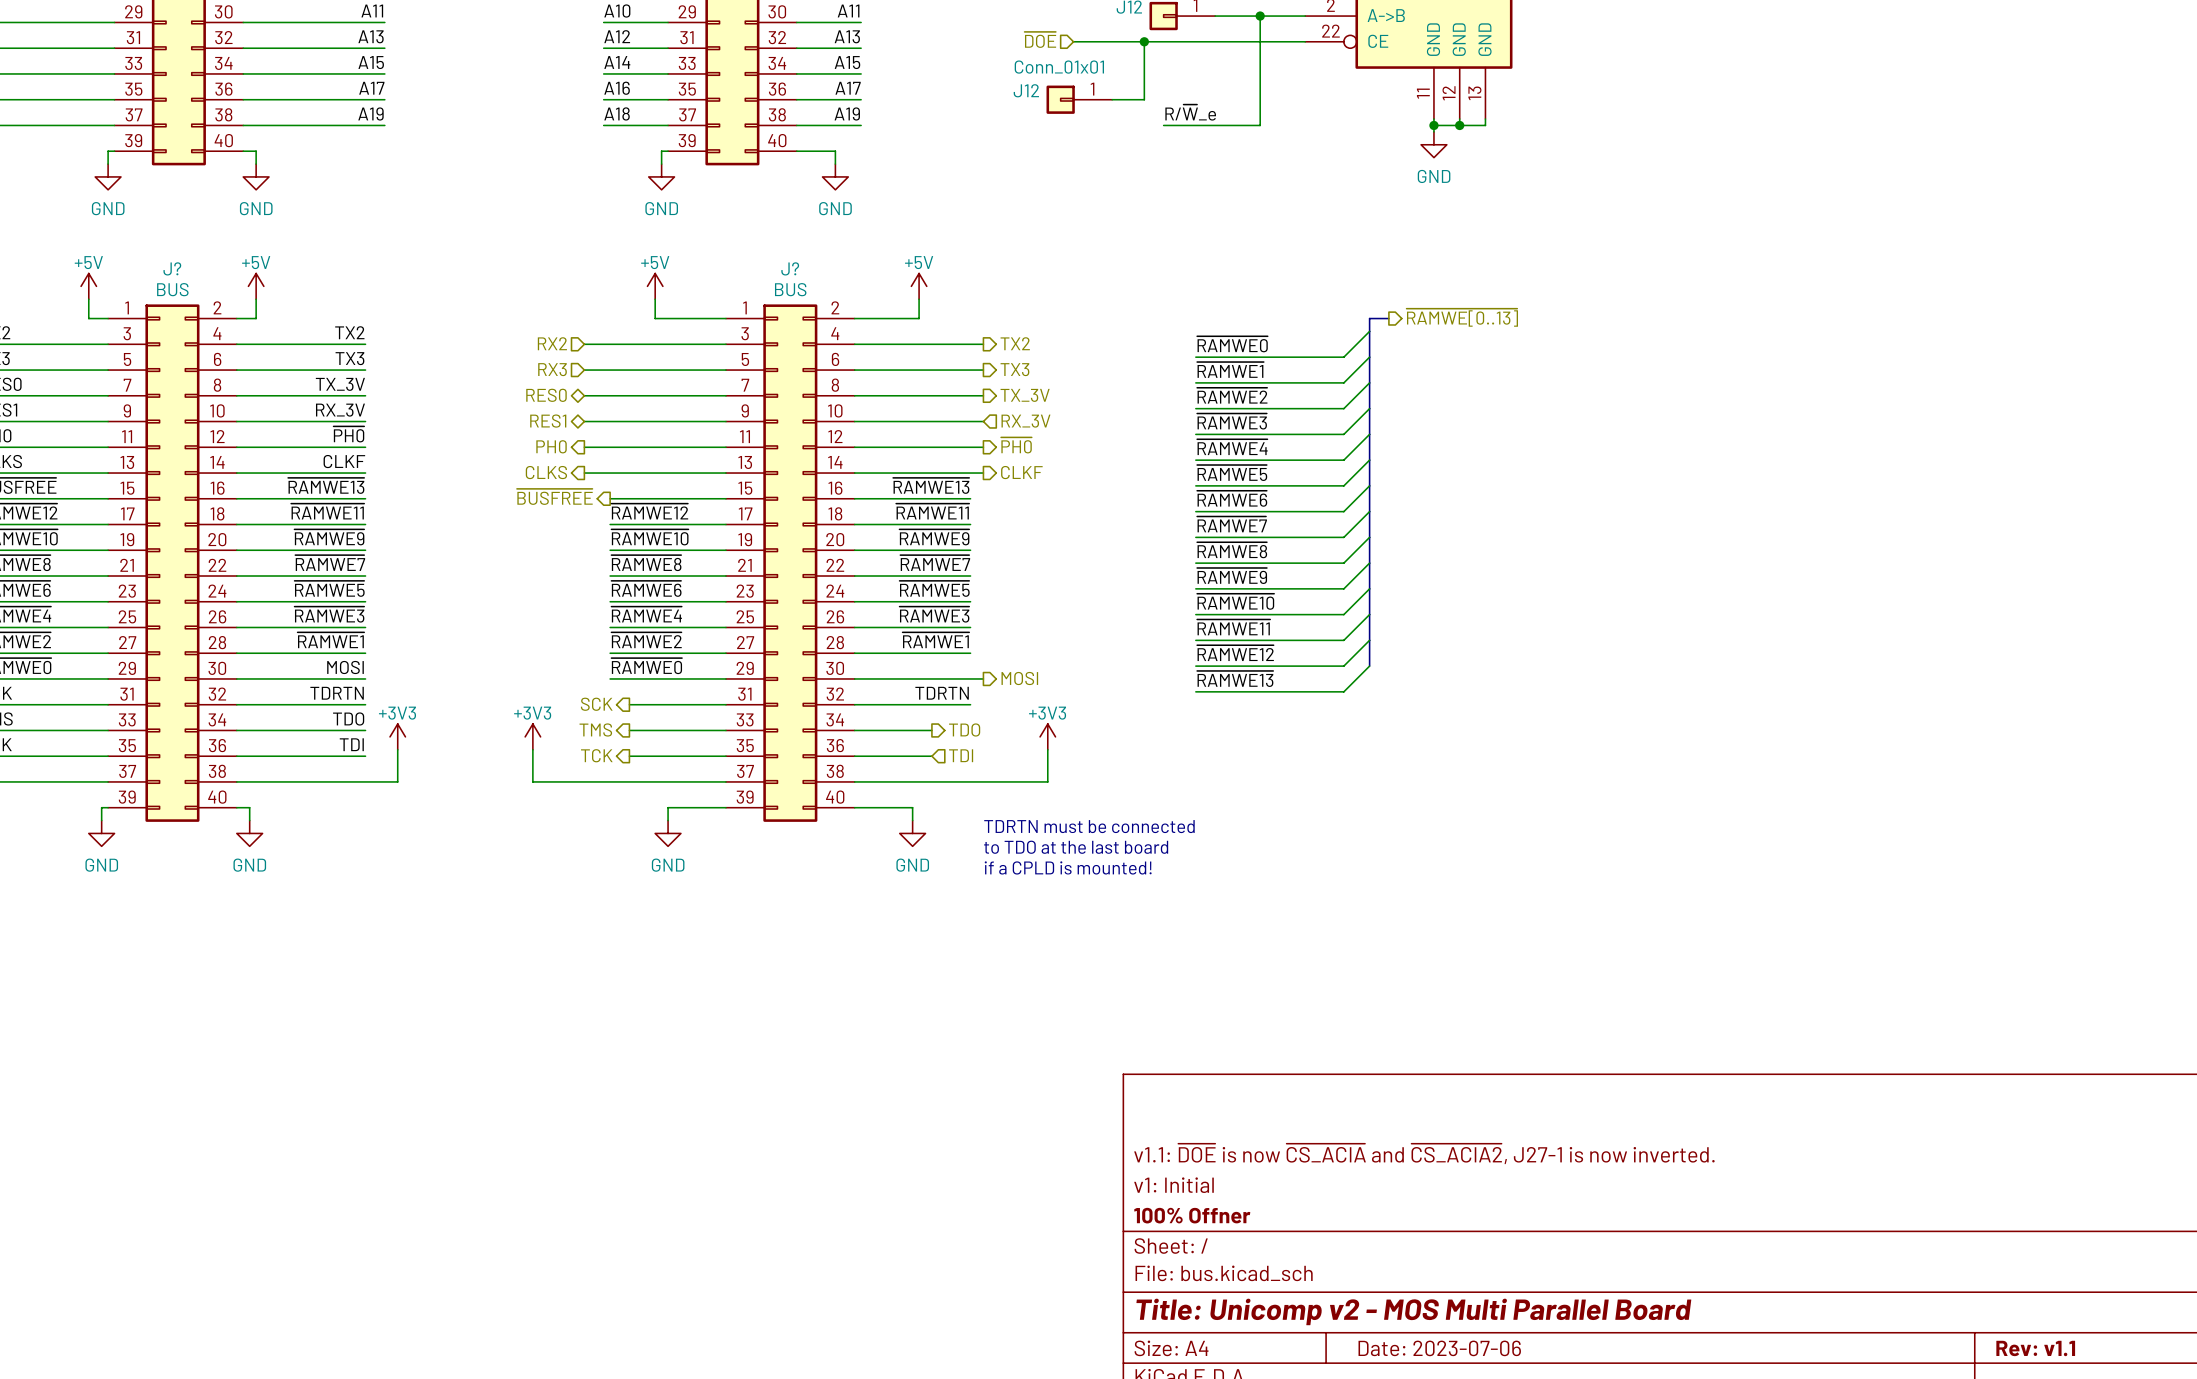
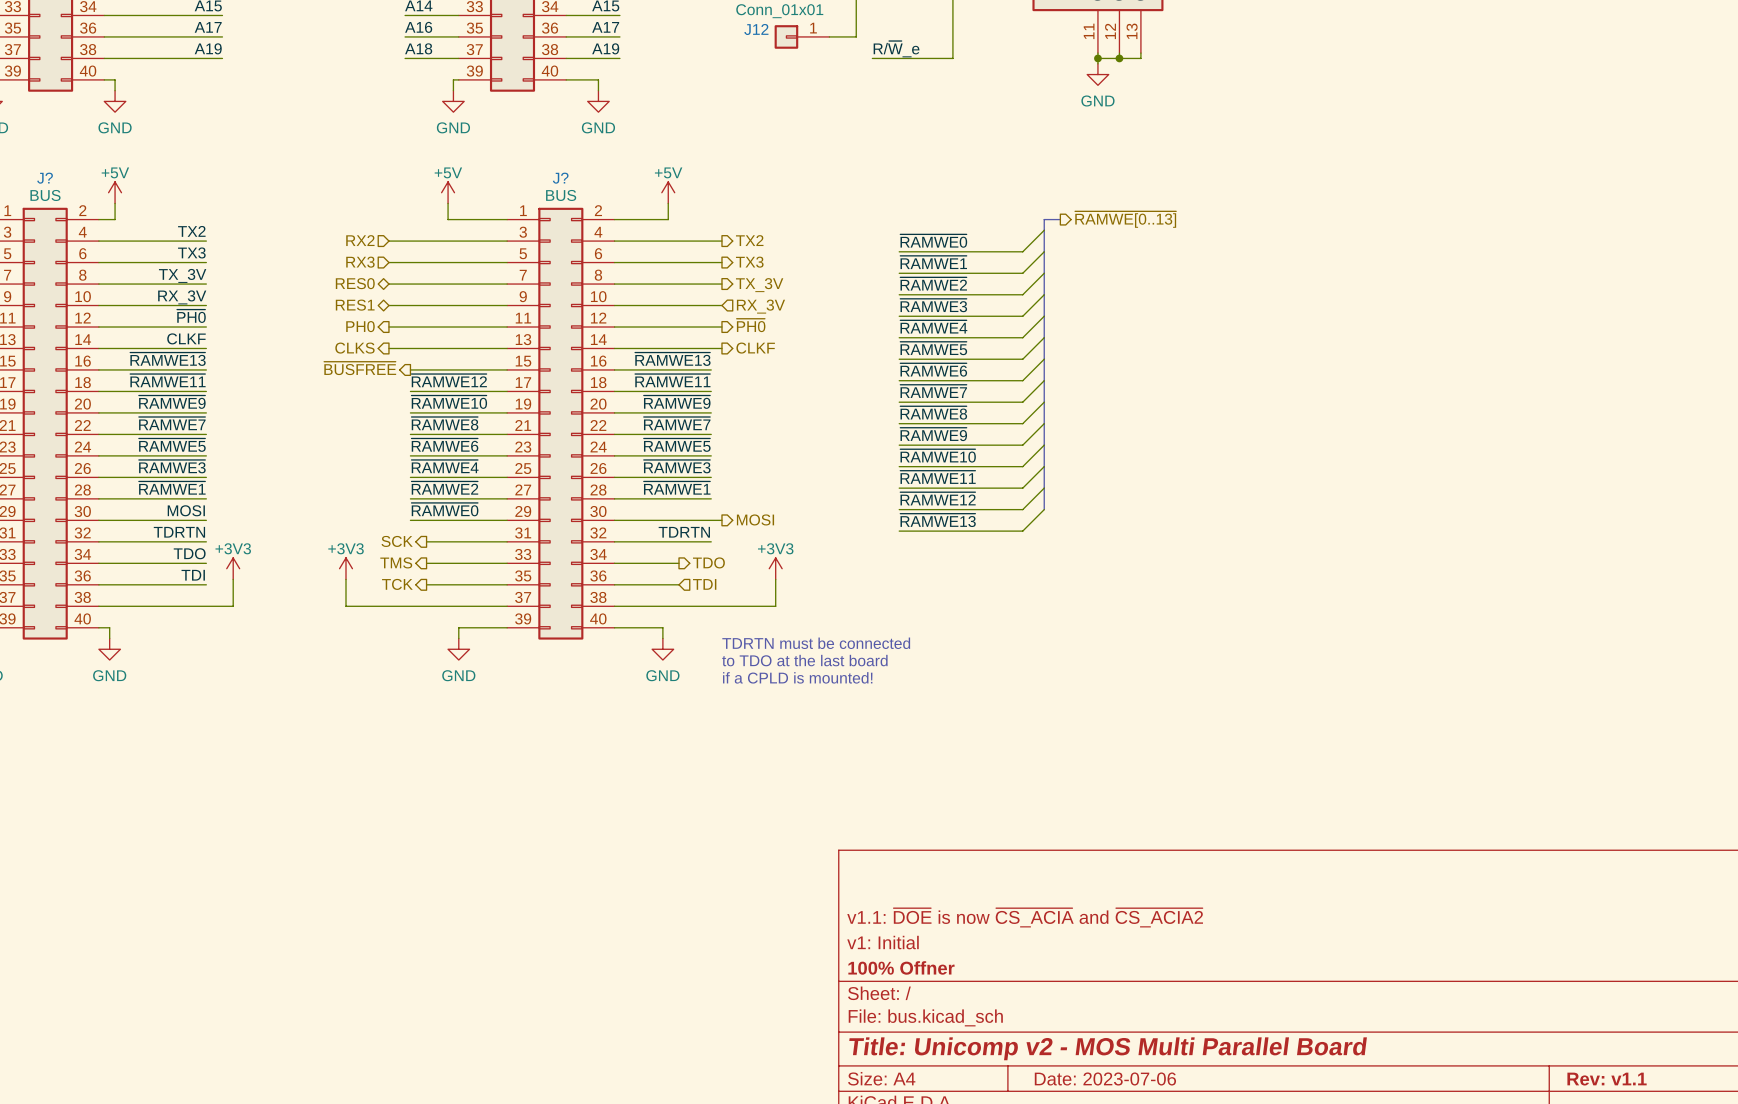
title block: v1.1: ~{DOE} is now ~{CS_ACIA} and ~{CS_ACIA2}, J27-1 is now inverted. (1424, 1153) -> v1.1: ~{DOE} is now ~{CS_ACIA} and ~{CS_ACIA2} (1025, 917)

